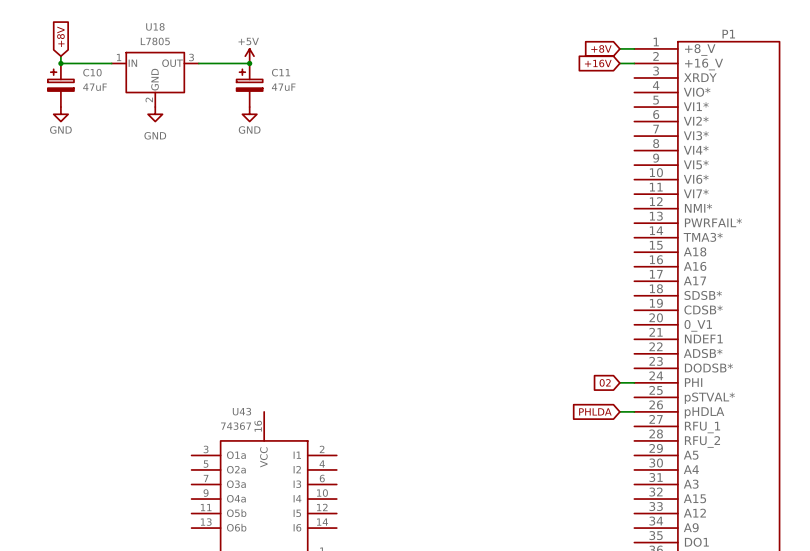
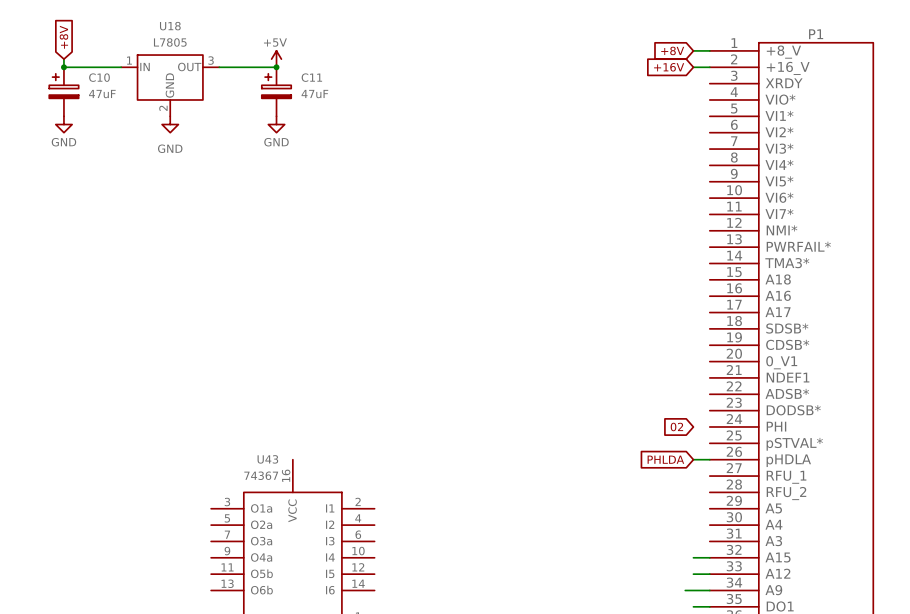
wire: (619, 382) (634, 382) -> (693, 557) (709, 557)
wire: none -> (693, 574) (709, 574)
wire: none -> (685, 590) (709, 590)
wire: none -> (693, 606) (709, 606)

